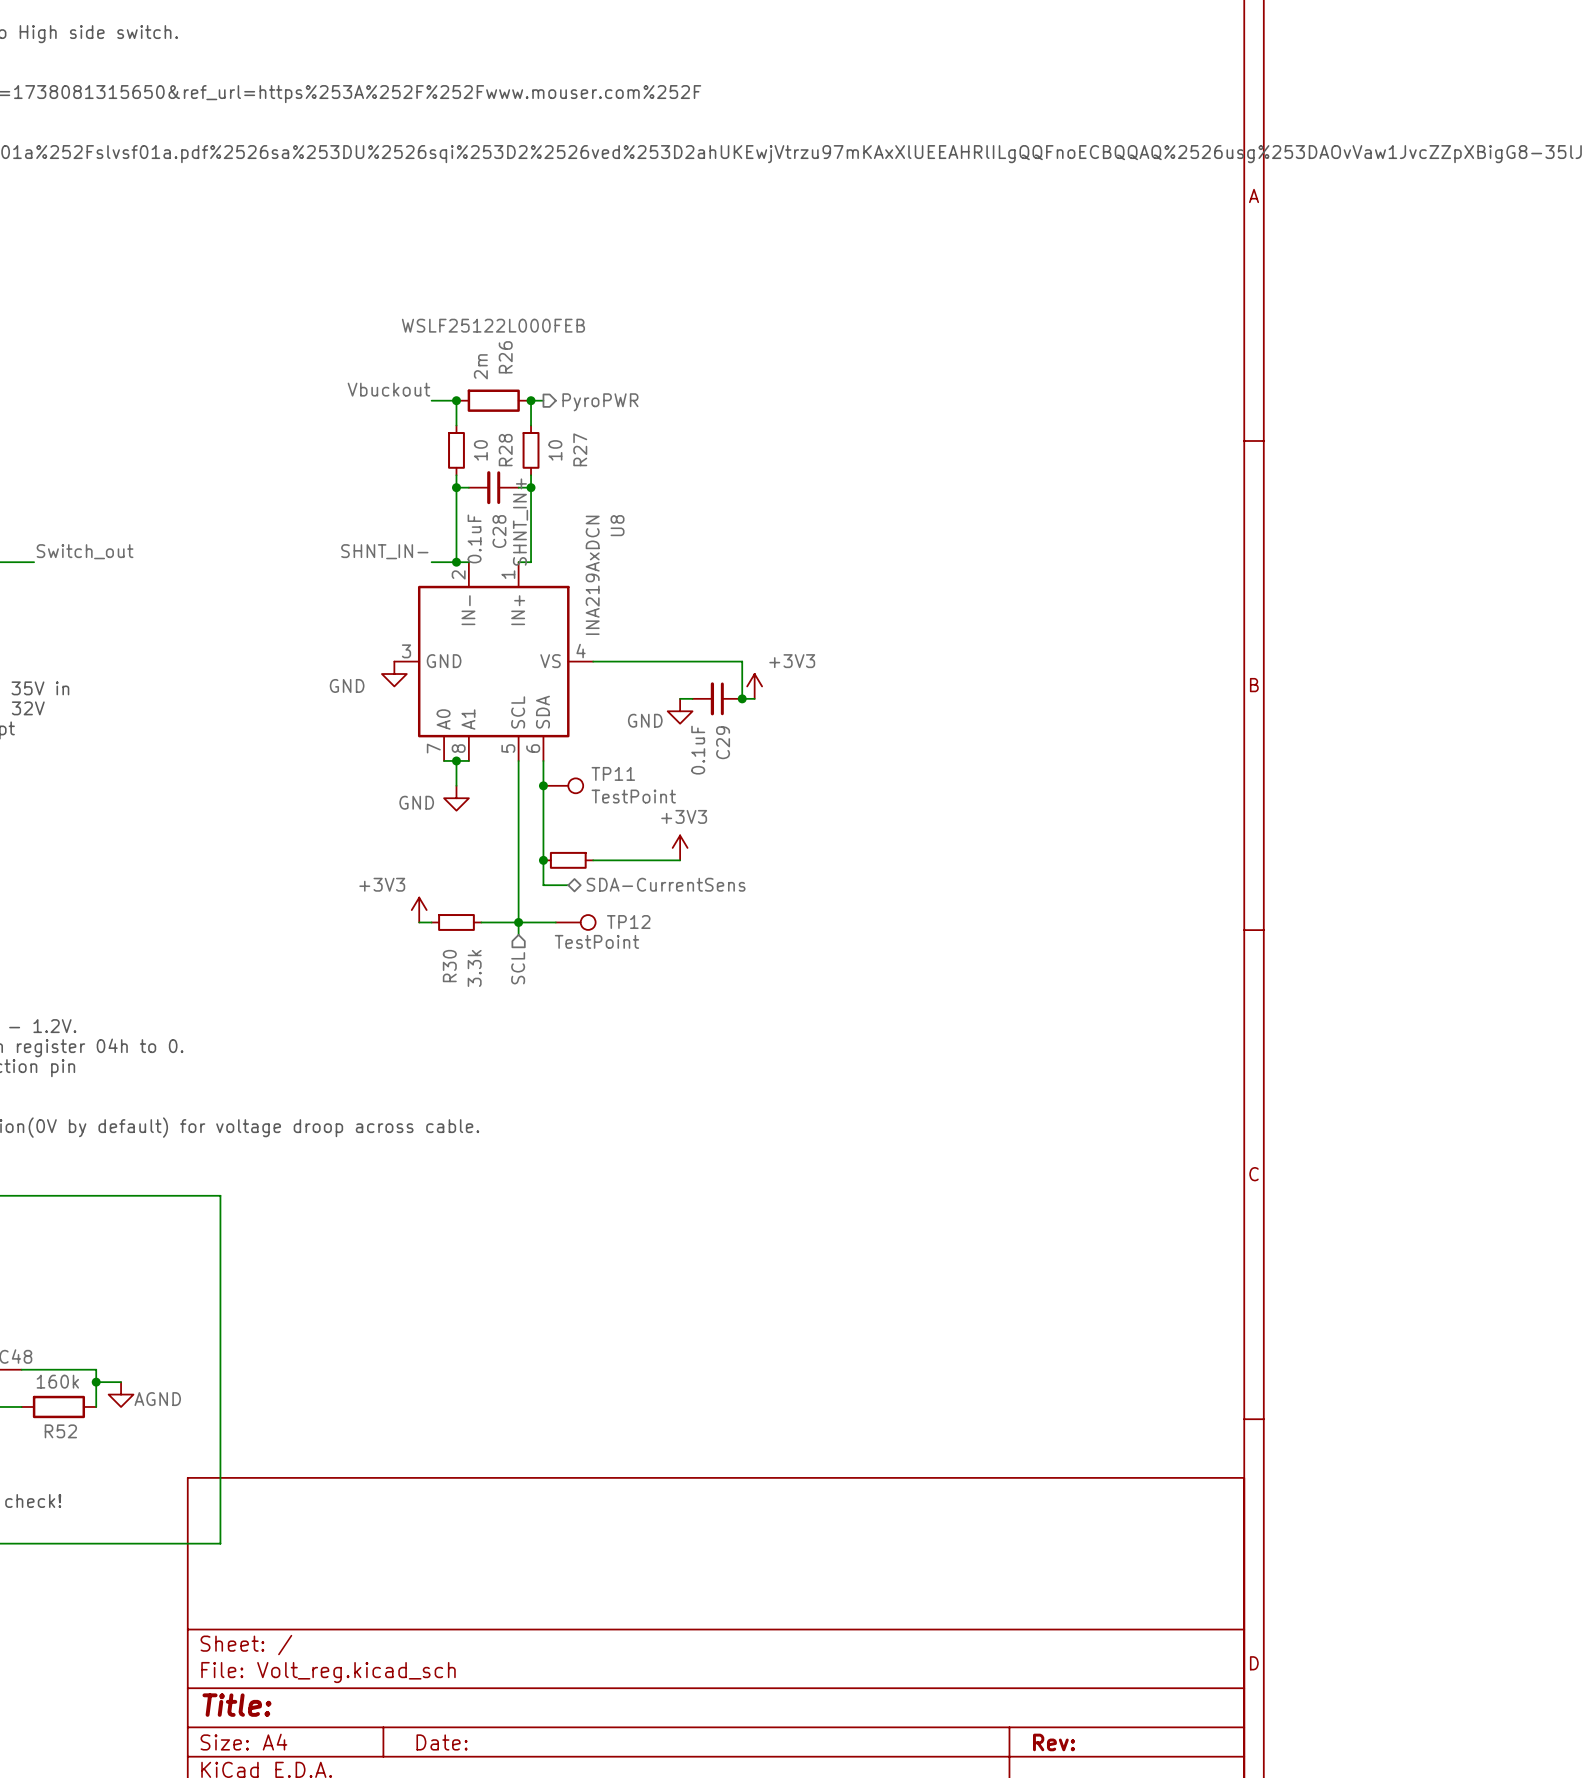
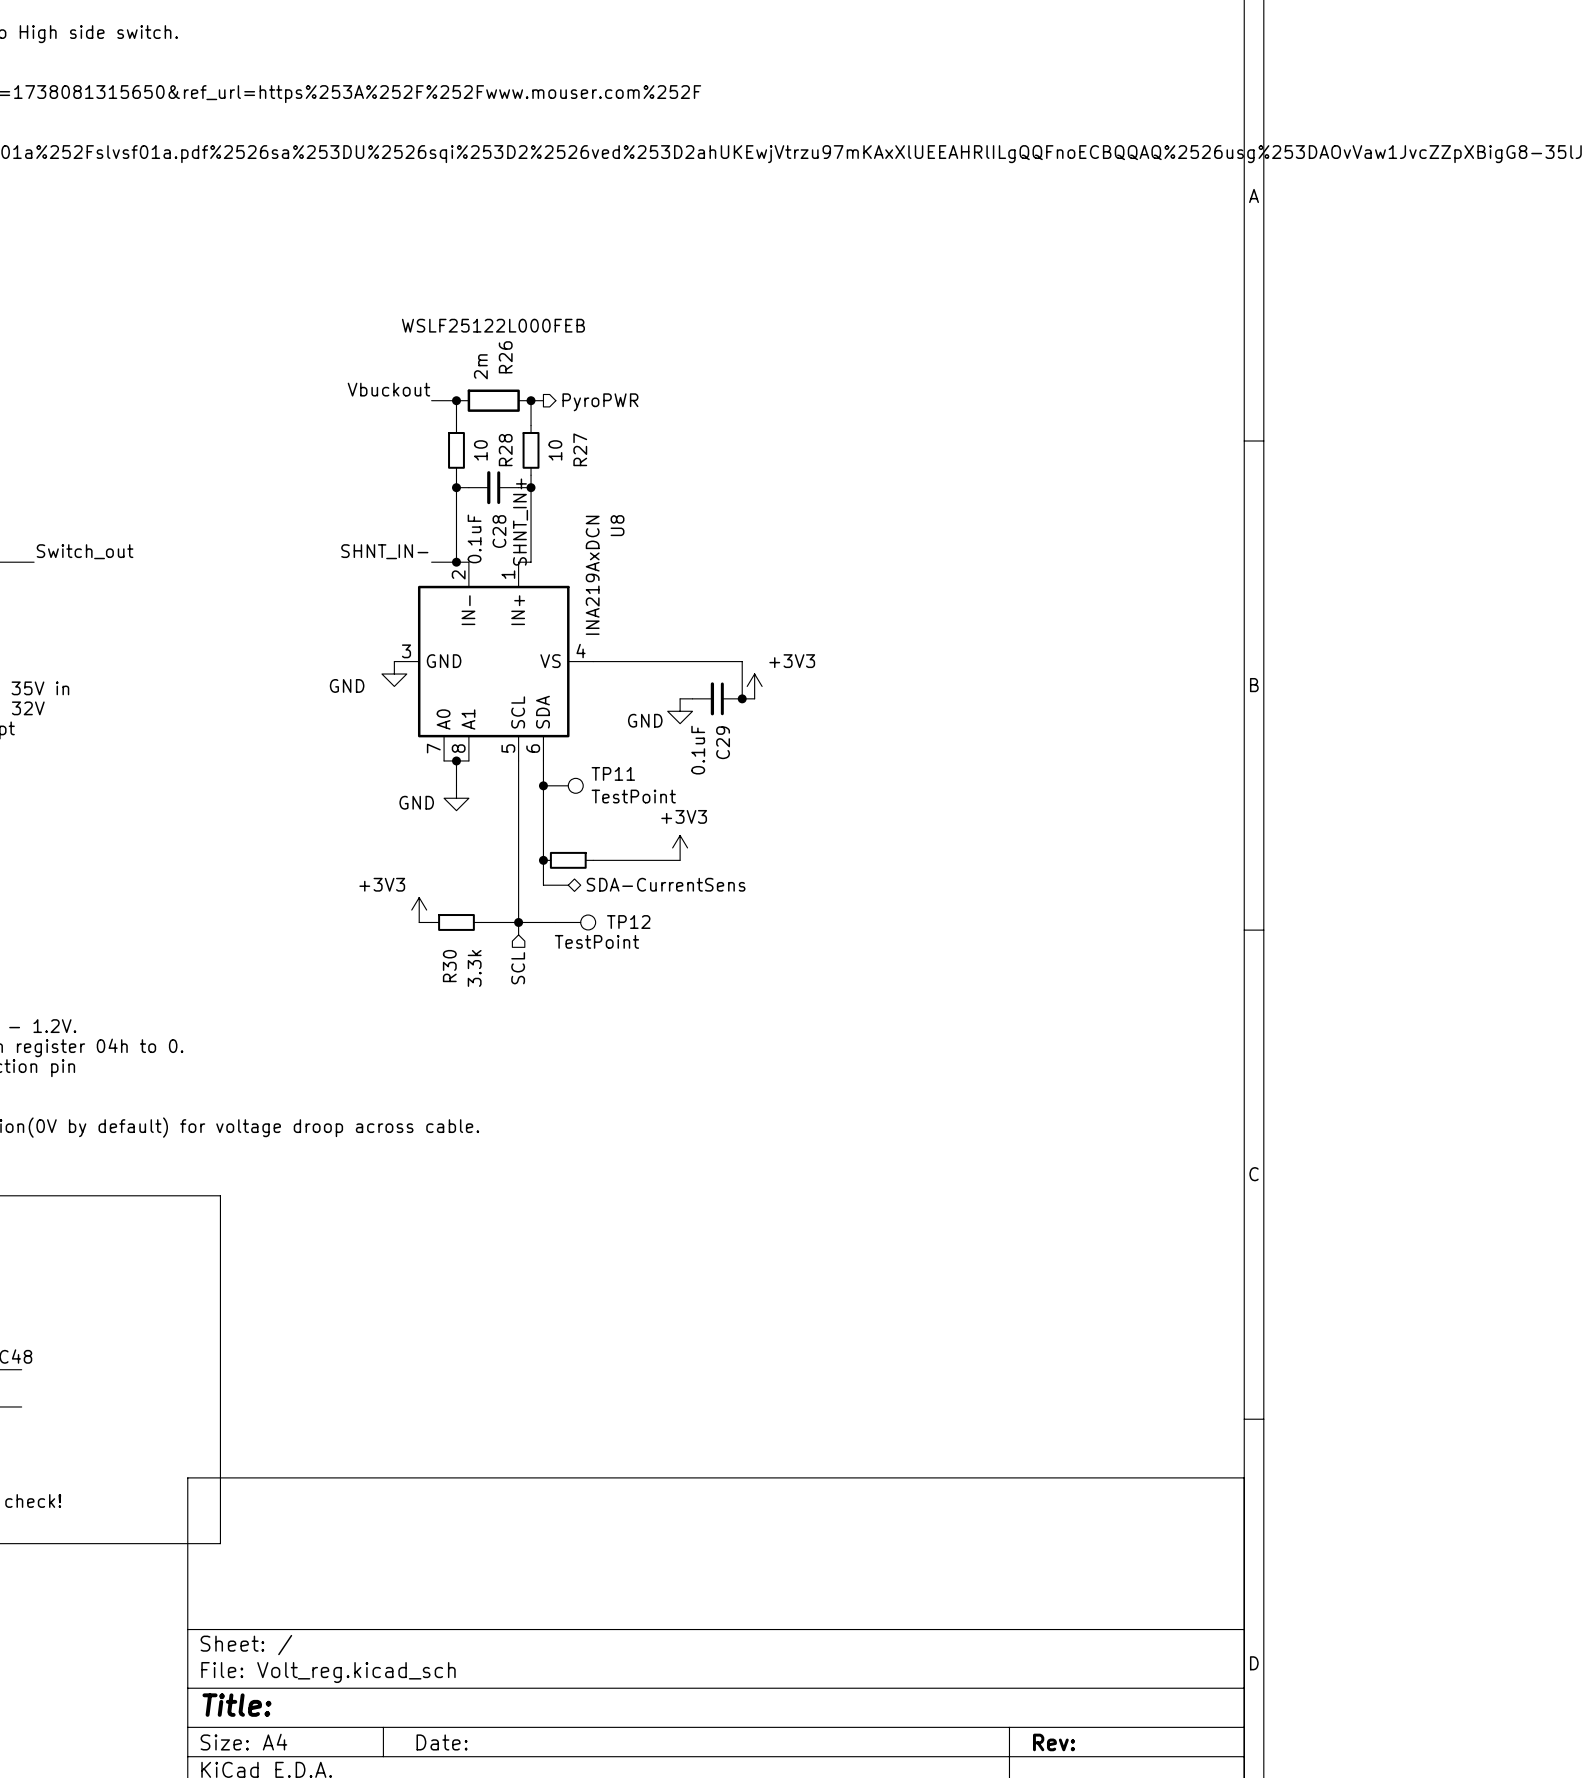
wire: (21, 1369) (96, 1369) (96, 1406) -> none
wire: (96, 1382) (121, 1382) -> none
junction: (96, 1382) -> none
power symbol: AGND (121, 1394) -> none
R52: 160k (58, 1406) -> none

